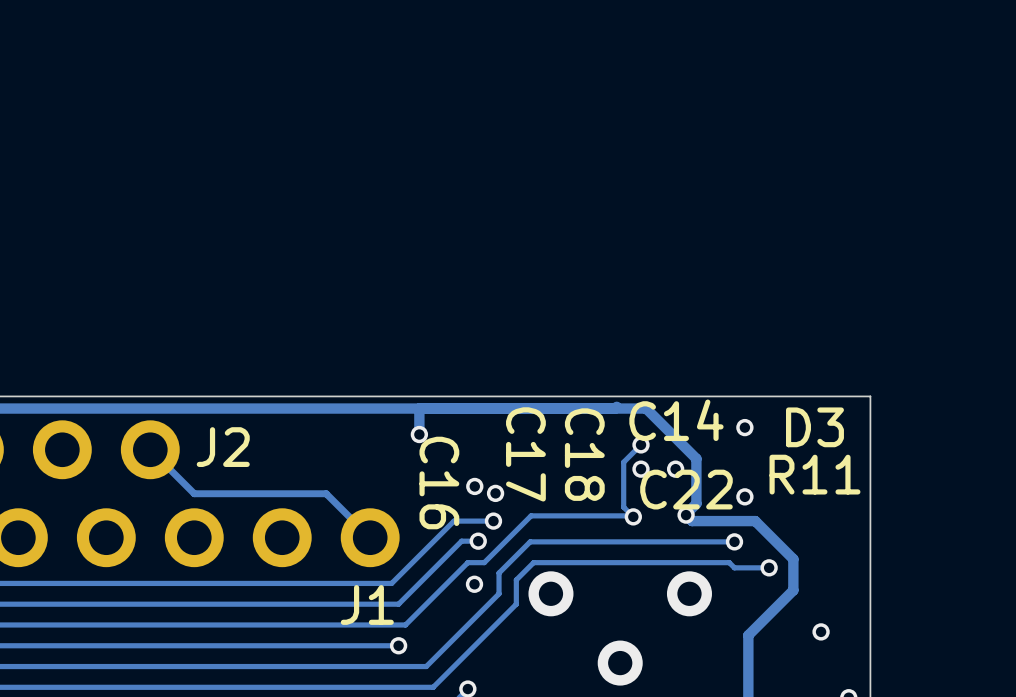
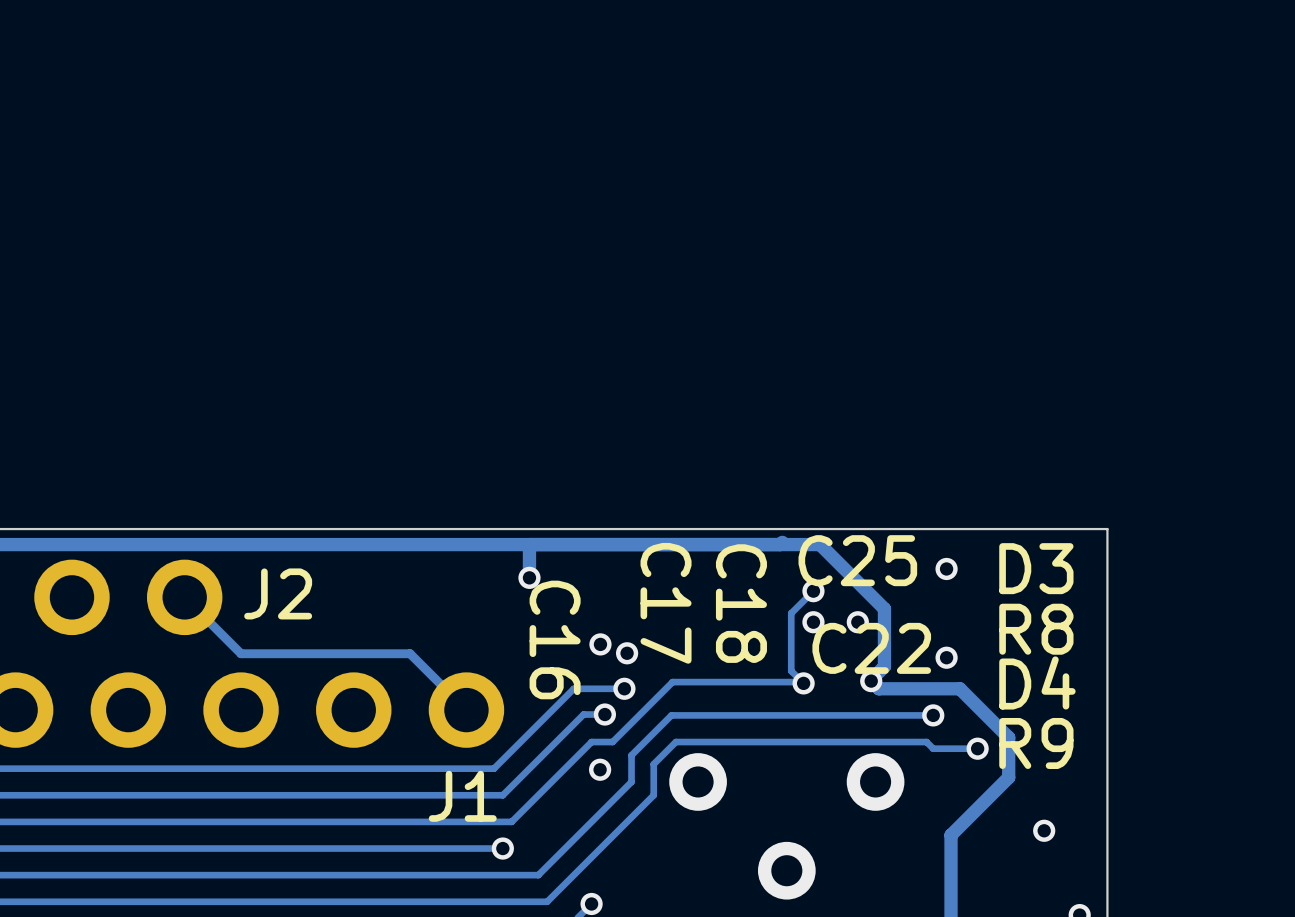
C14 name: C14 (676, 420) -> C25 (857, 560)
R11 name: R11 (814, 474) -> R8 (1036, 629)
D4: none -> (1037, 682)
R9: none -> (1036, 743)

